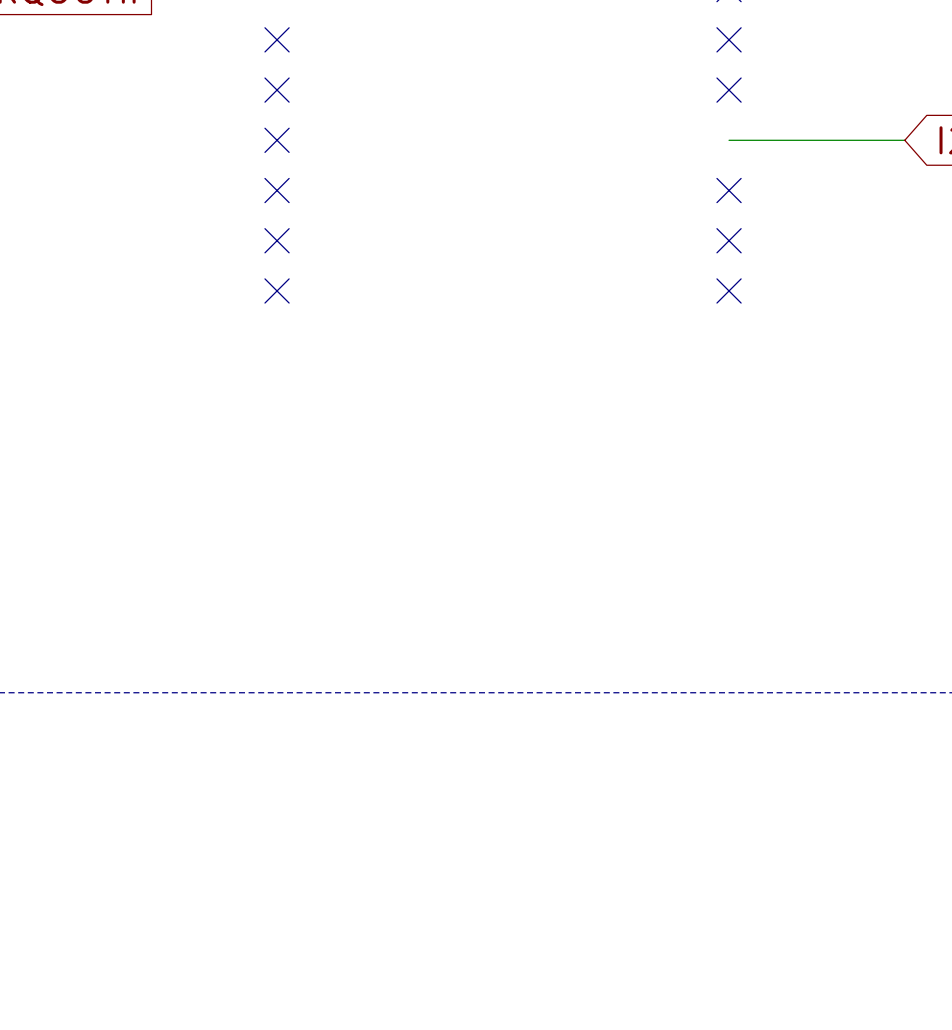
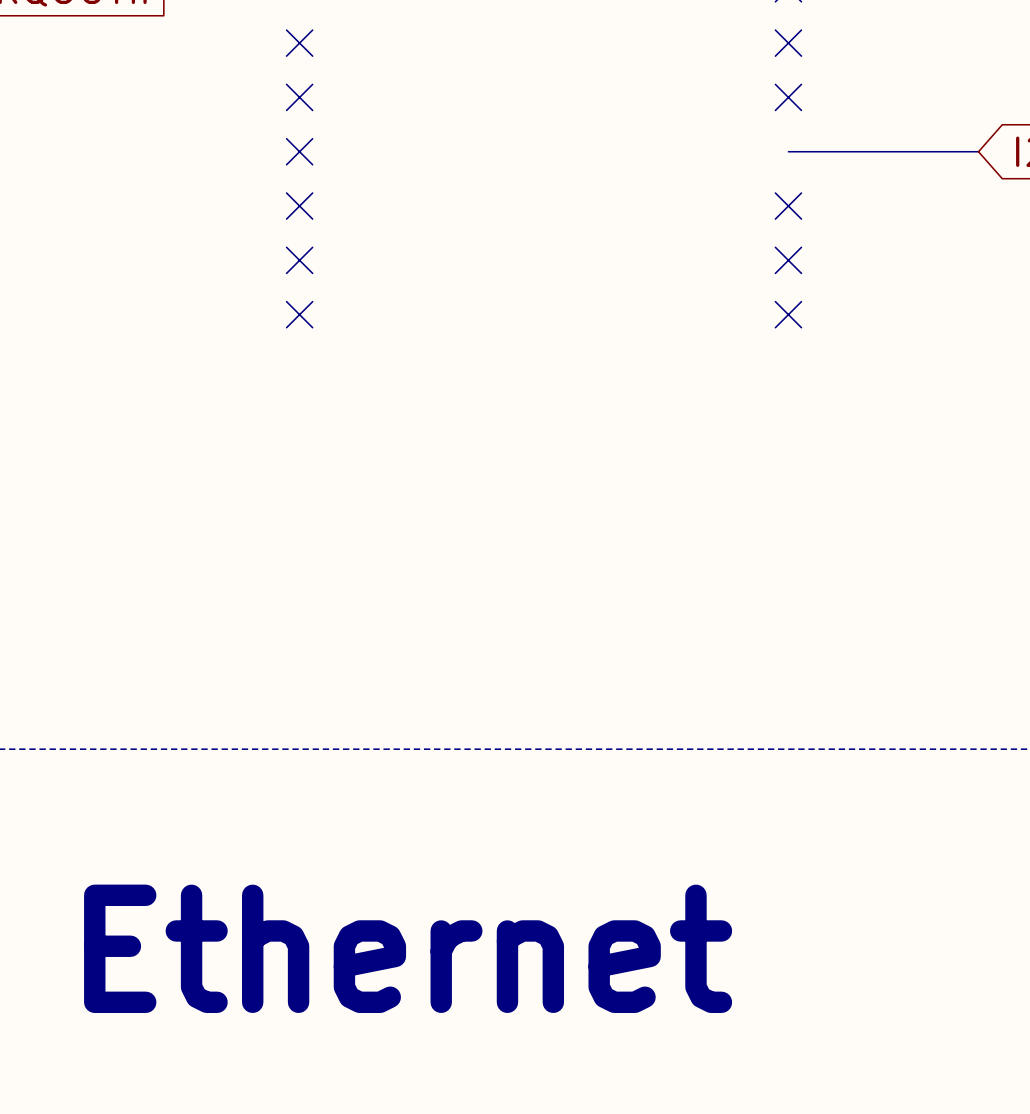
text: none -> Ethernet (408, 948)

